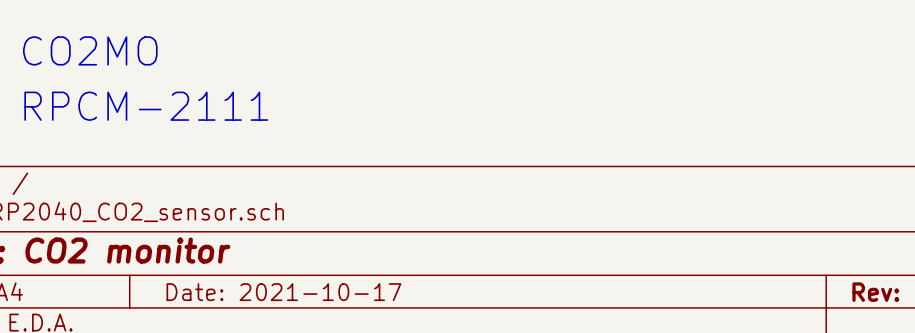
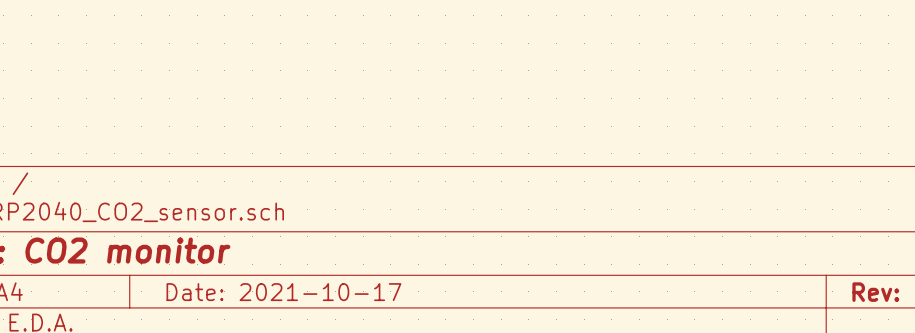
text: CO2MO (90, 50) -> none
text: RPCM-2111 (146, 106) -> none

